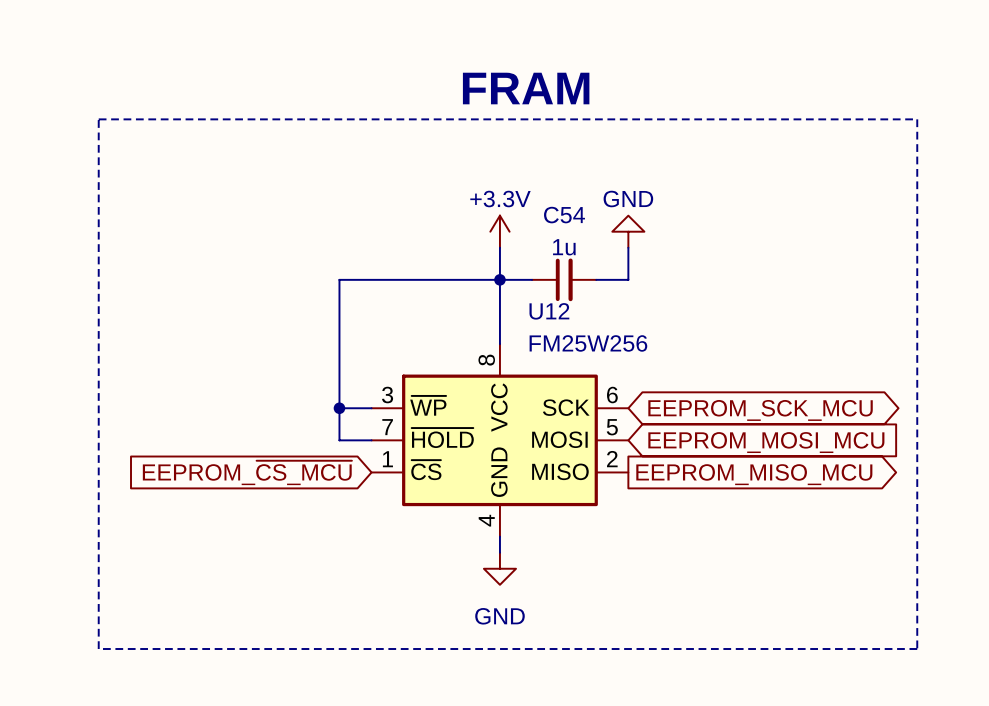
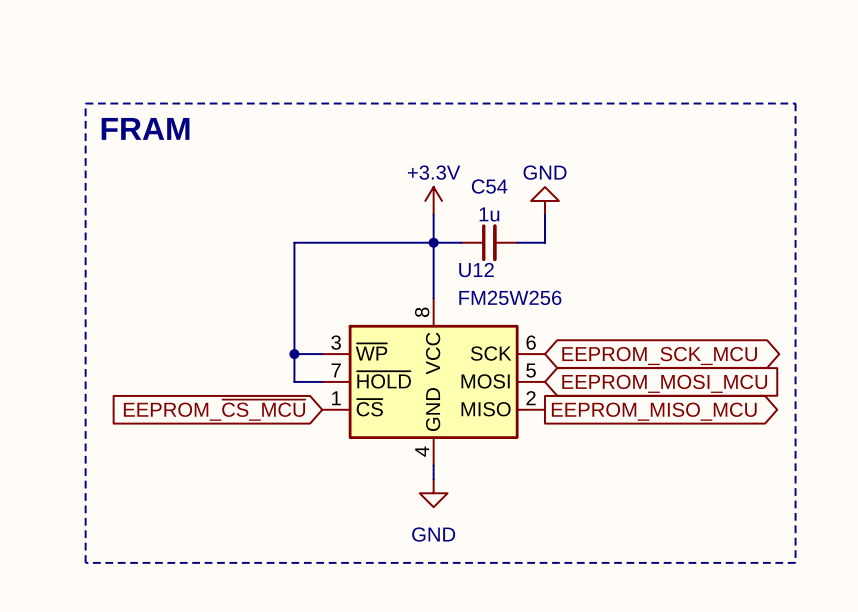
text: FRAM (526, 88) -> none
text: none -> FRAM (145, 128)

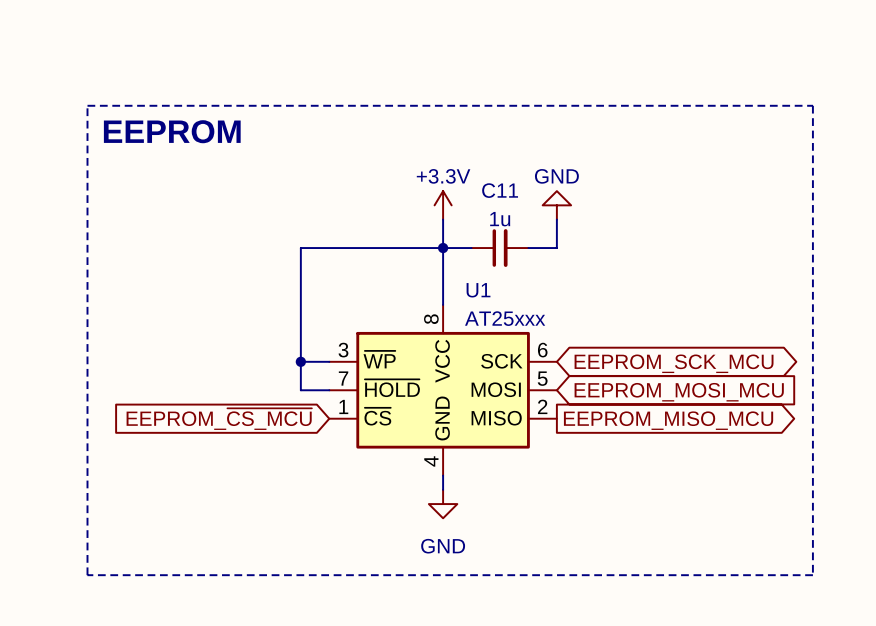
text: FRAM (145, 128) -> EEPROM (172, 131)
C54 name: C54 (489, 186) -> C11 (500, 190)
U12 name: U12 (476, 270) -> U1 (478, 290)
U12 value: FM25W256 (510, 297) -> AT25xxx (505, 318)

